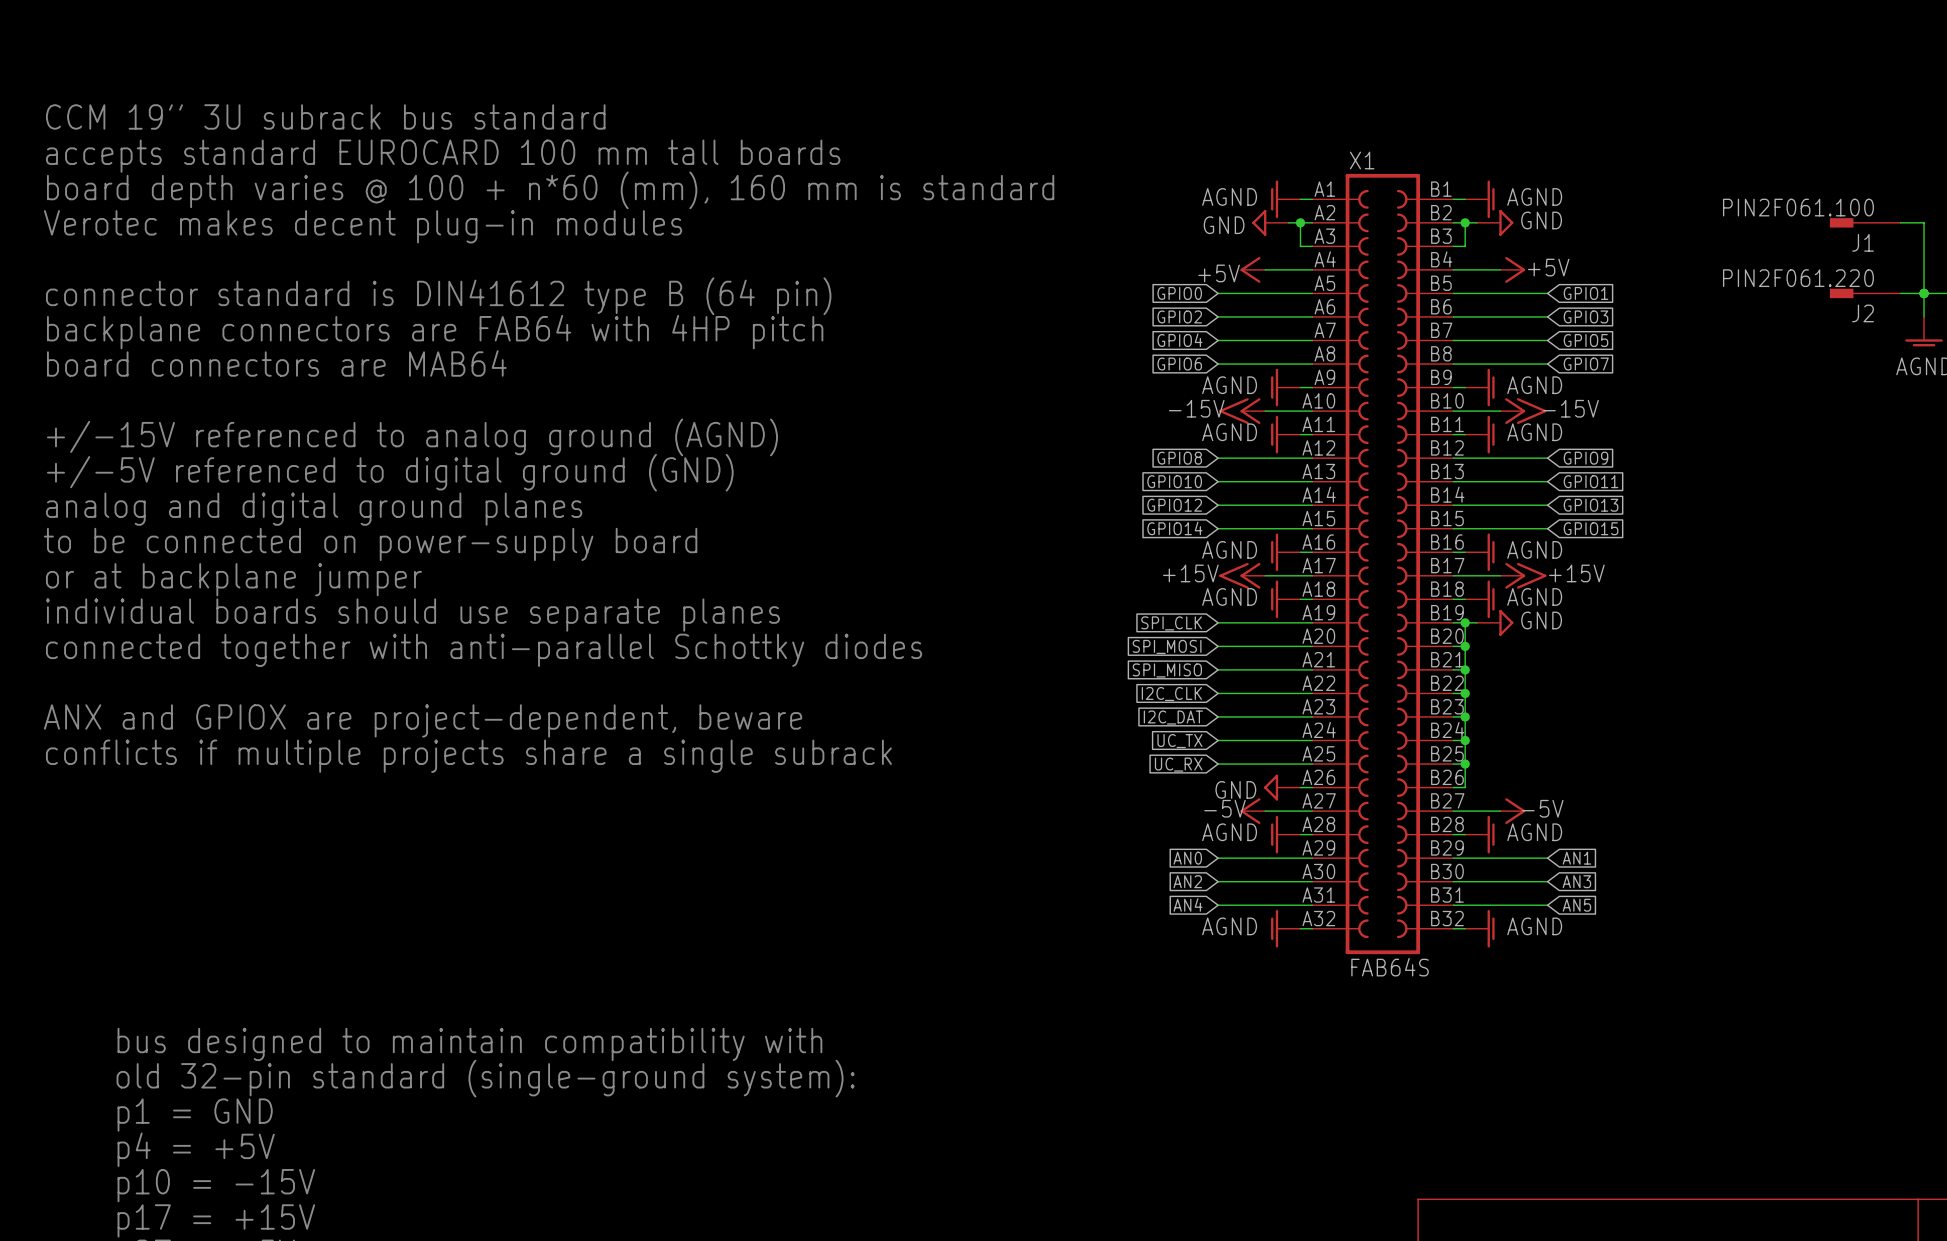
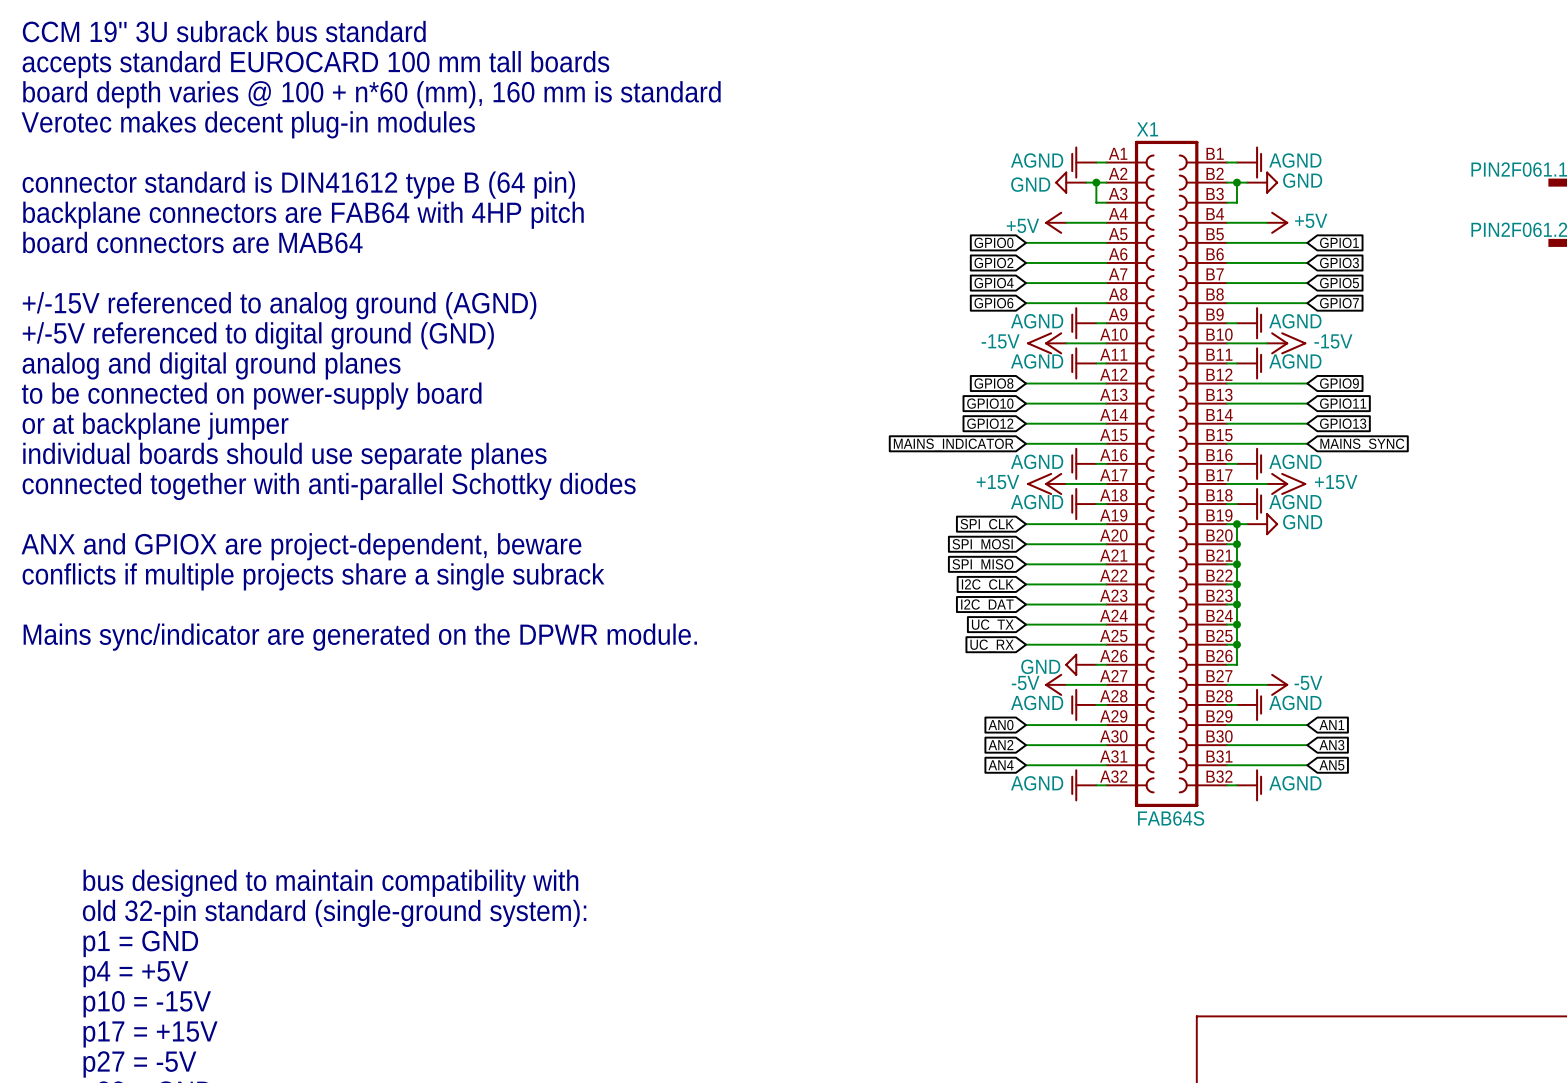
text: none -> CCM 19'' 3U subrack bus standard (224, 31)
text: none -> accepts standard EUROCARD 100 mm tall boards (315, 64)
text: CCM 19'' 3U subrack bus standard (325, 116) -> board depth varies @ 100 + n*60 (mm), 160 mm is standard (371, 94)
text: accepts standard EUROCARD 100 mm tall boards (443, 156) -> Verotec makes decent plug-in modules (248, 124)
text: board depth varies @ 100 + n*60 (mm), 160 mm is standard (550, 190) -> none
text: Verotec makes decent plug-in modules (363, 226) -> connector standard is DIN41612 type B (64 pin) (298, 185)
text: connector standard is DIN41612 type B (64 pin) (438, 296) -> board connectors are MAB64 (192, 242)
text position: backplane connectors are FAB64 with 4HP pitch (435, 332) -> backplane connectors are FAB64 with 4HP pitch (303, 215)
text: board connectors are MAB64 (276, 363) -> +/-15V referenced to analog ground (AGND) (279, 305)
text: none -> +/-5V referenced to digital ground (GND) (258, 335)
text: +/-15V referenced to analog ground (AGND) (412, 437) -> analog and digital ground planes (211, 365)
text: +/-5V referenced to digital ground (GND) (390, 472) -> to be connected on power-supply board (251, 396)
text: analog and digital ground planes (314, 509) -> or at backplane jumper (155, 426)
global label: GPIO14 (1174, 528) -> MAINS_INDICATOR (953, 445)
global label: GPIO15 (1591, 528) -> MAINS_SYNC (1362, 445)
text: to be connected on power-supply board (370, 544) -> individual boards should use separate planes (284, 456)
text: or at backplane jumper (233, 579) -> connected together with anti-parallel Schottky diodes (329, 486)
text: individual boards should use separate planes (412, 615) -> none
text: connected together with anti-parallel Schottky diodes (484, 650) -> ANX and GPIOX are project-dependent, beware (301, 546)
text: none -> conflicts if multiple projects share a single subrack (313, 576)
text: ANX and GPIOX are project-dependent, beware (423, 720) -> none
text: conflicts if multiple projects share a single subrack (468, 756) -> Mains sync/indicator are generated on the DPWR module. (360, 637)

